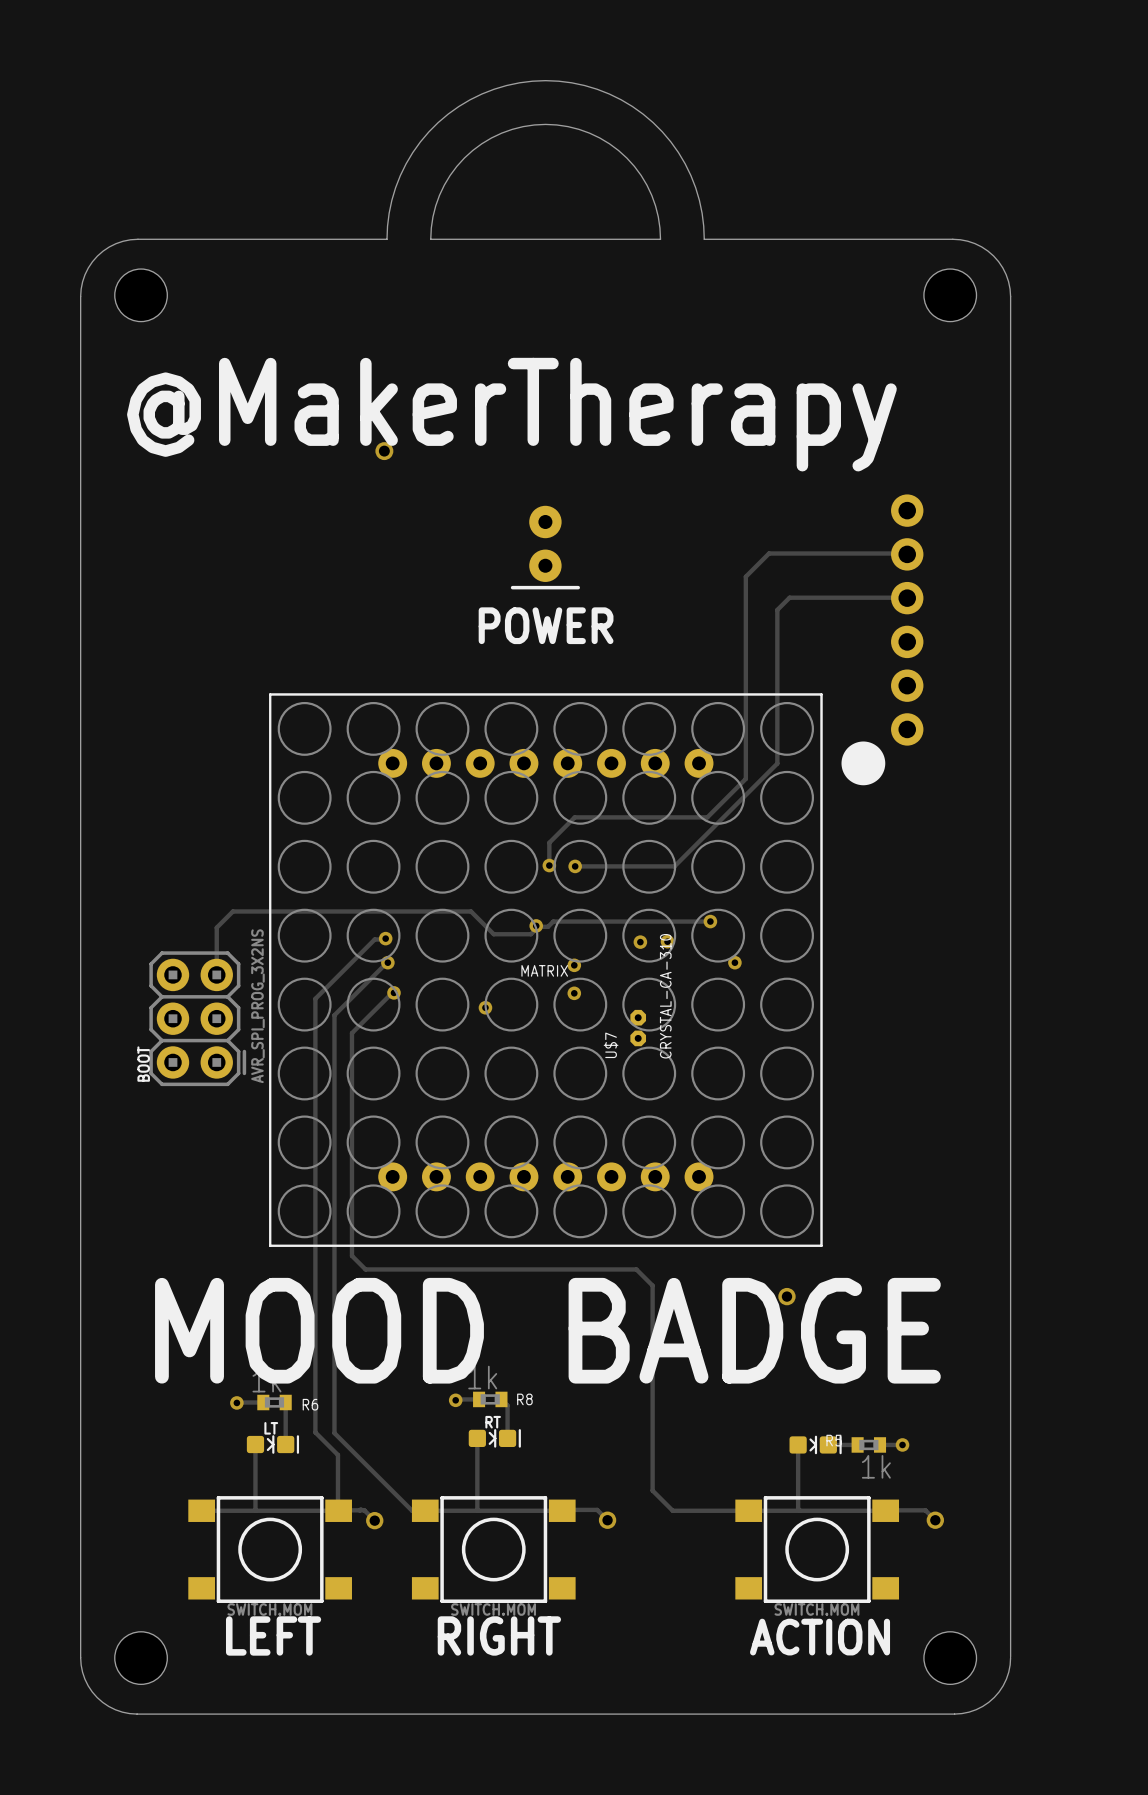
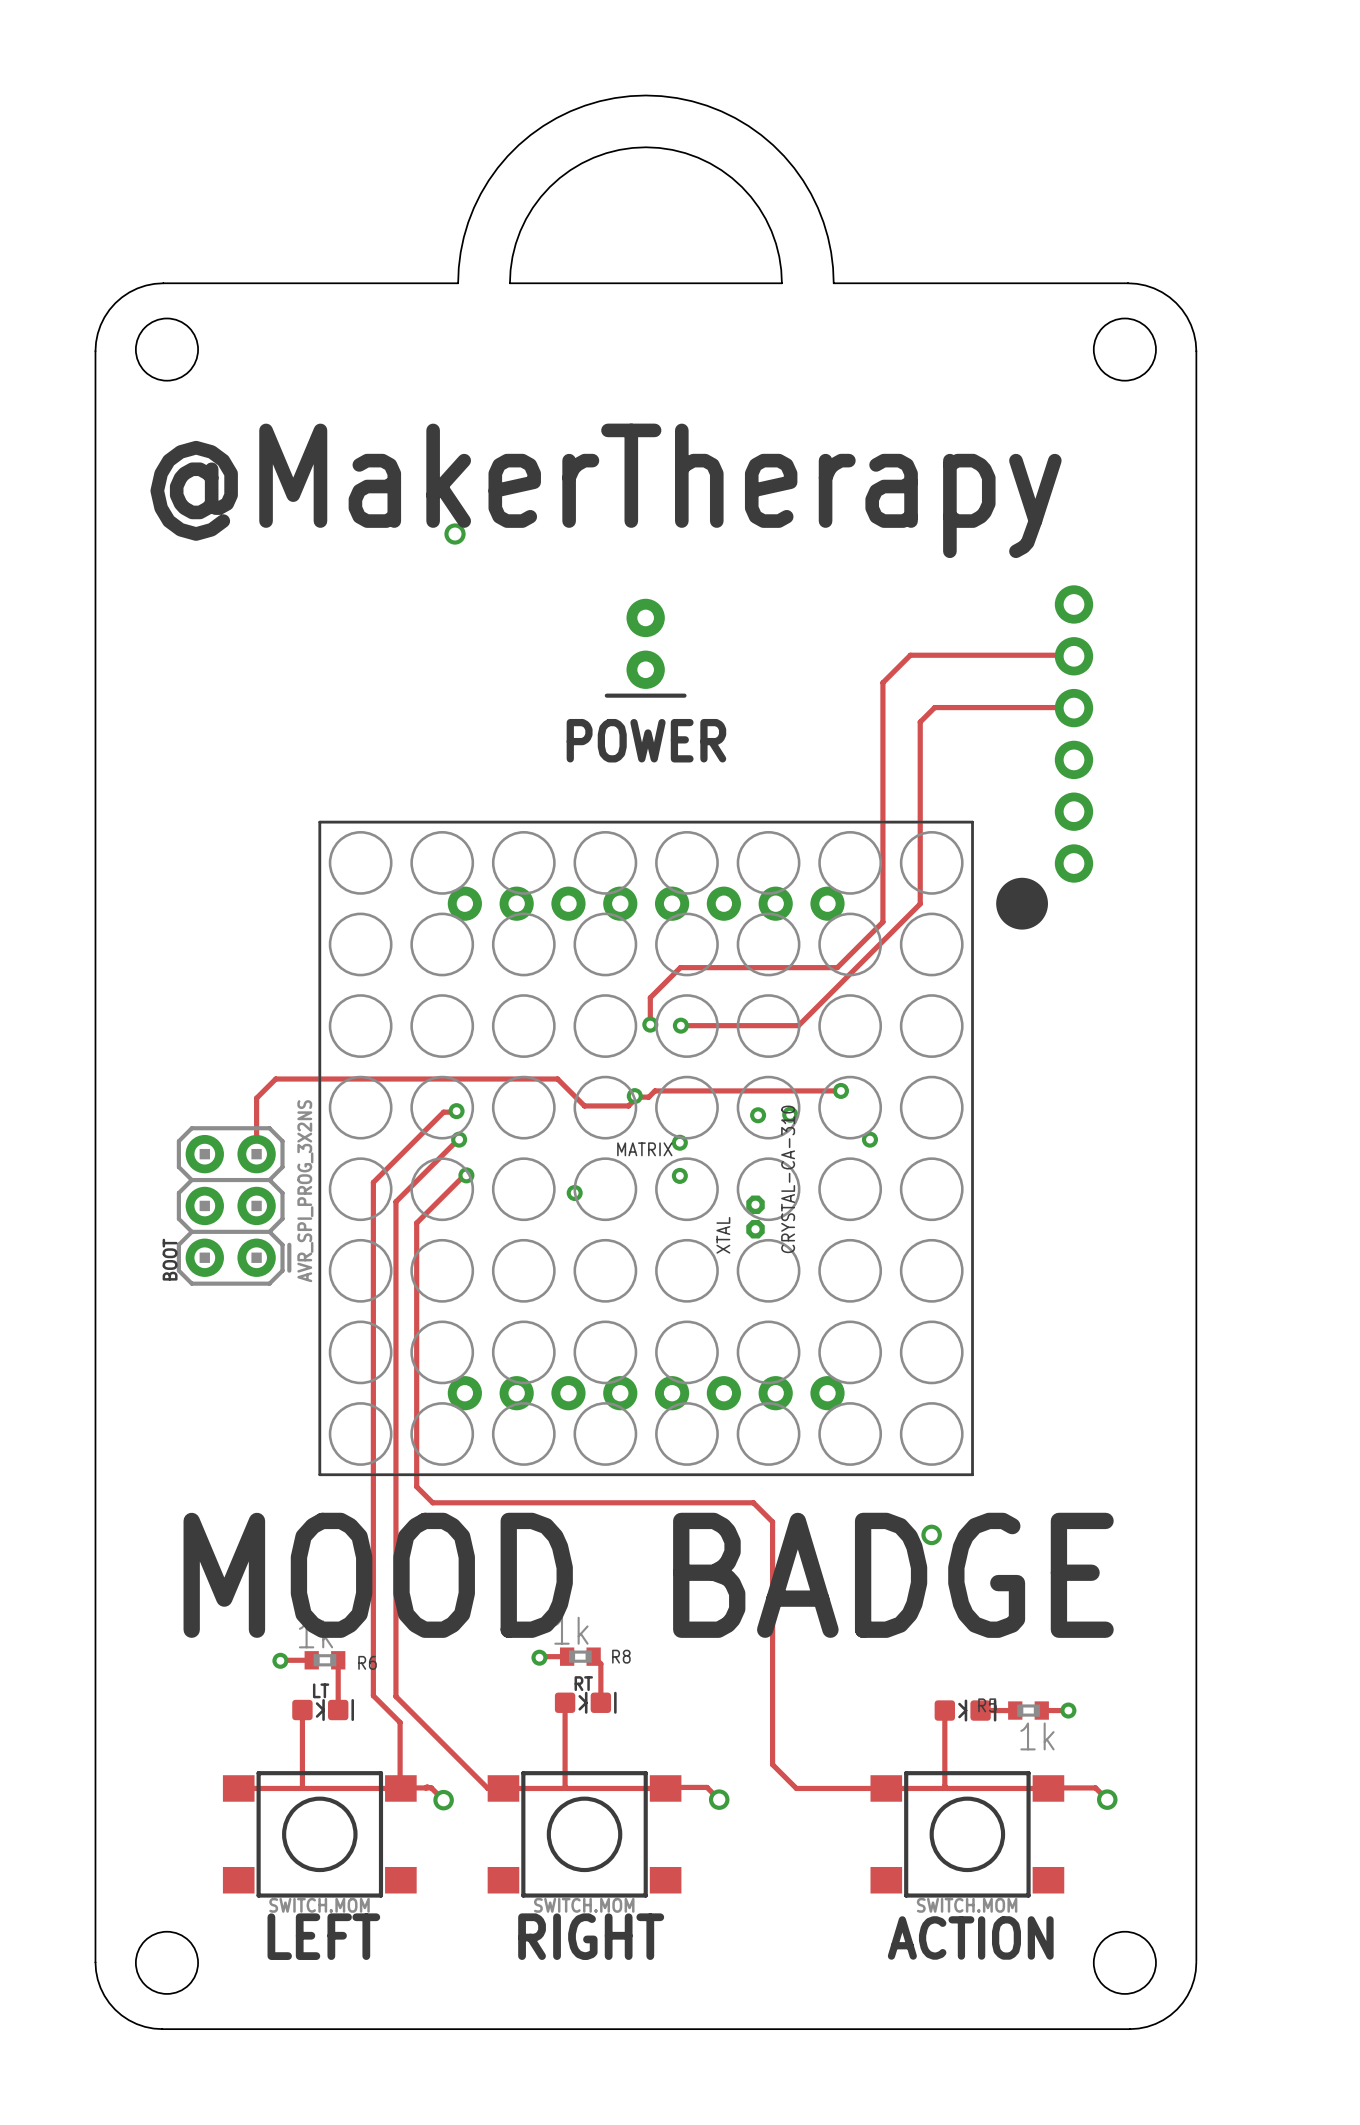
U$7 name: U$7 (611, 1045) -> XTAL (723, 1235)

